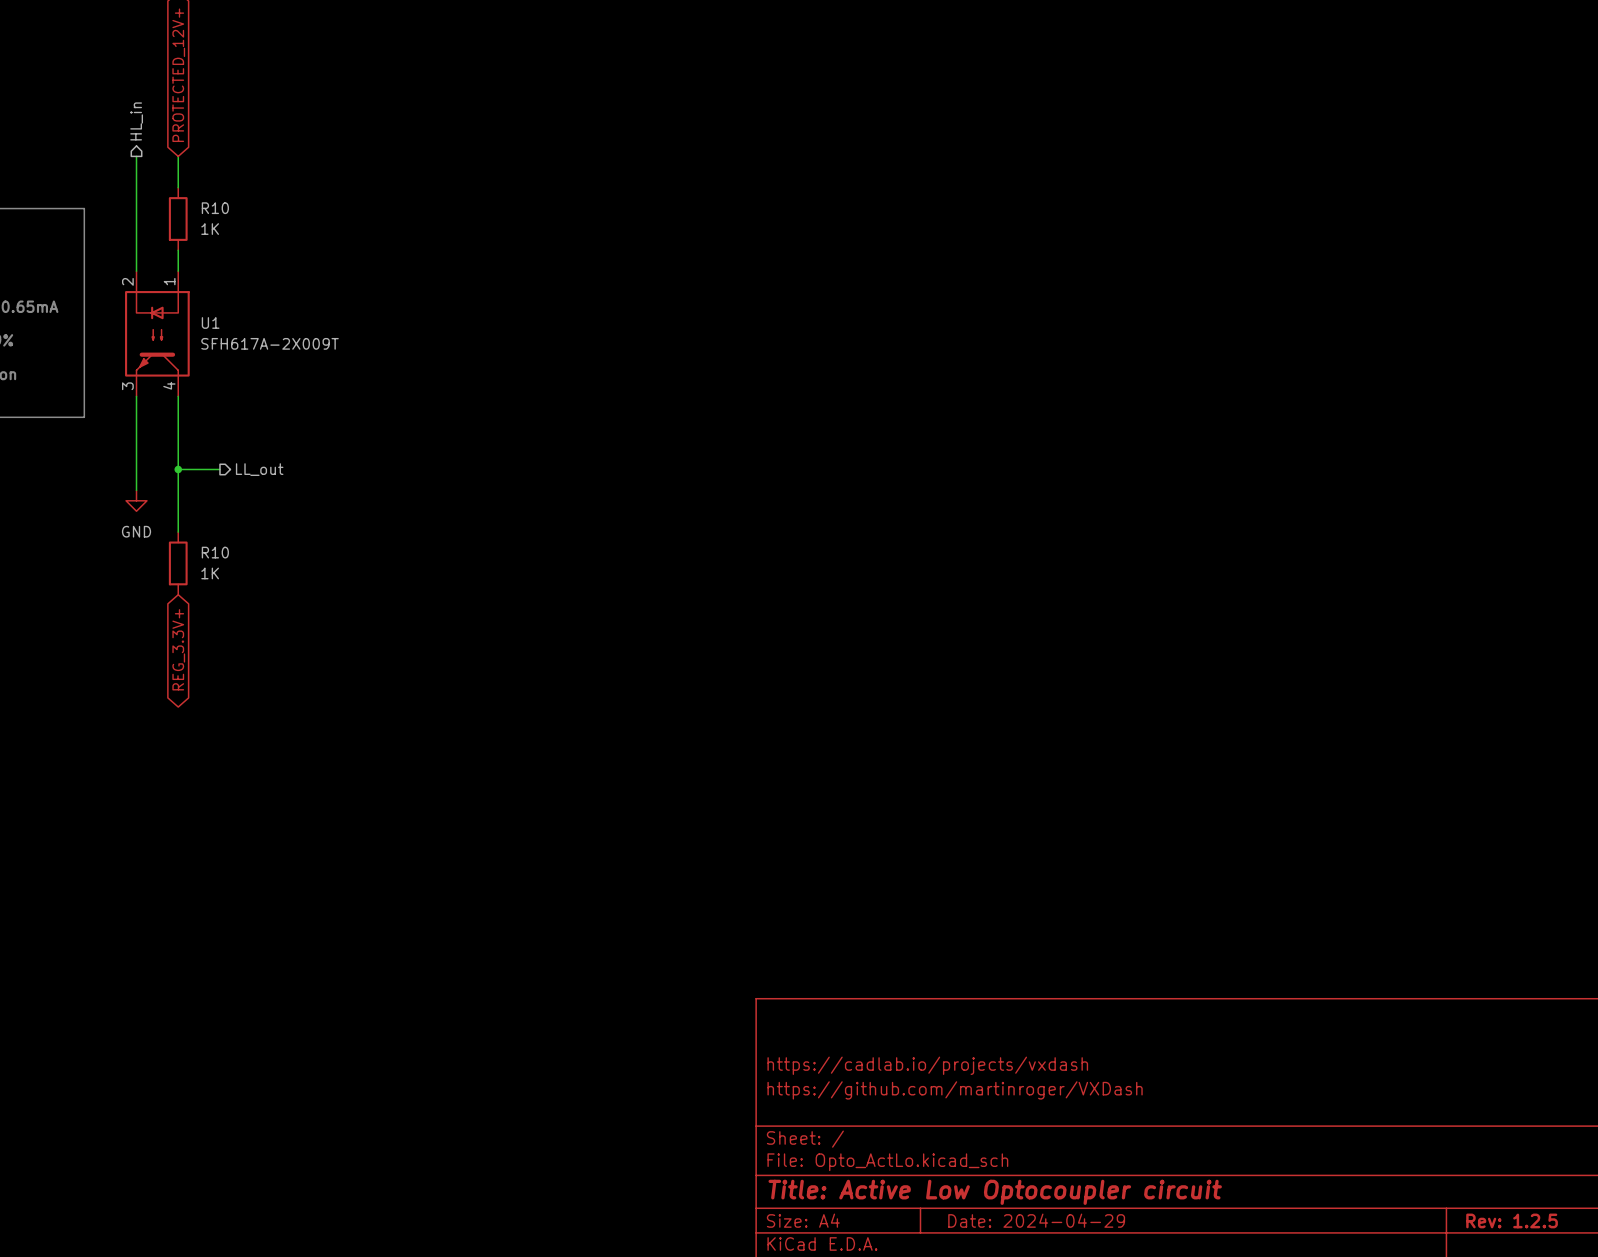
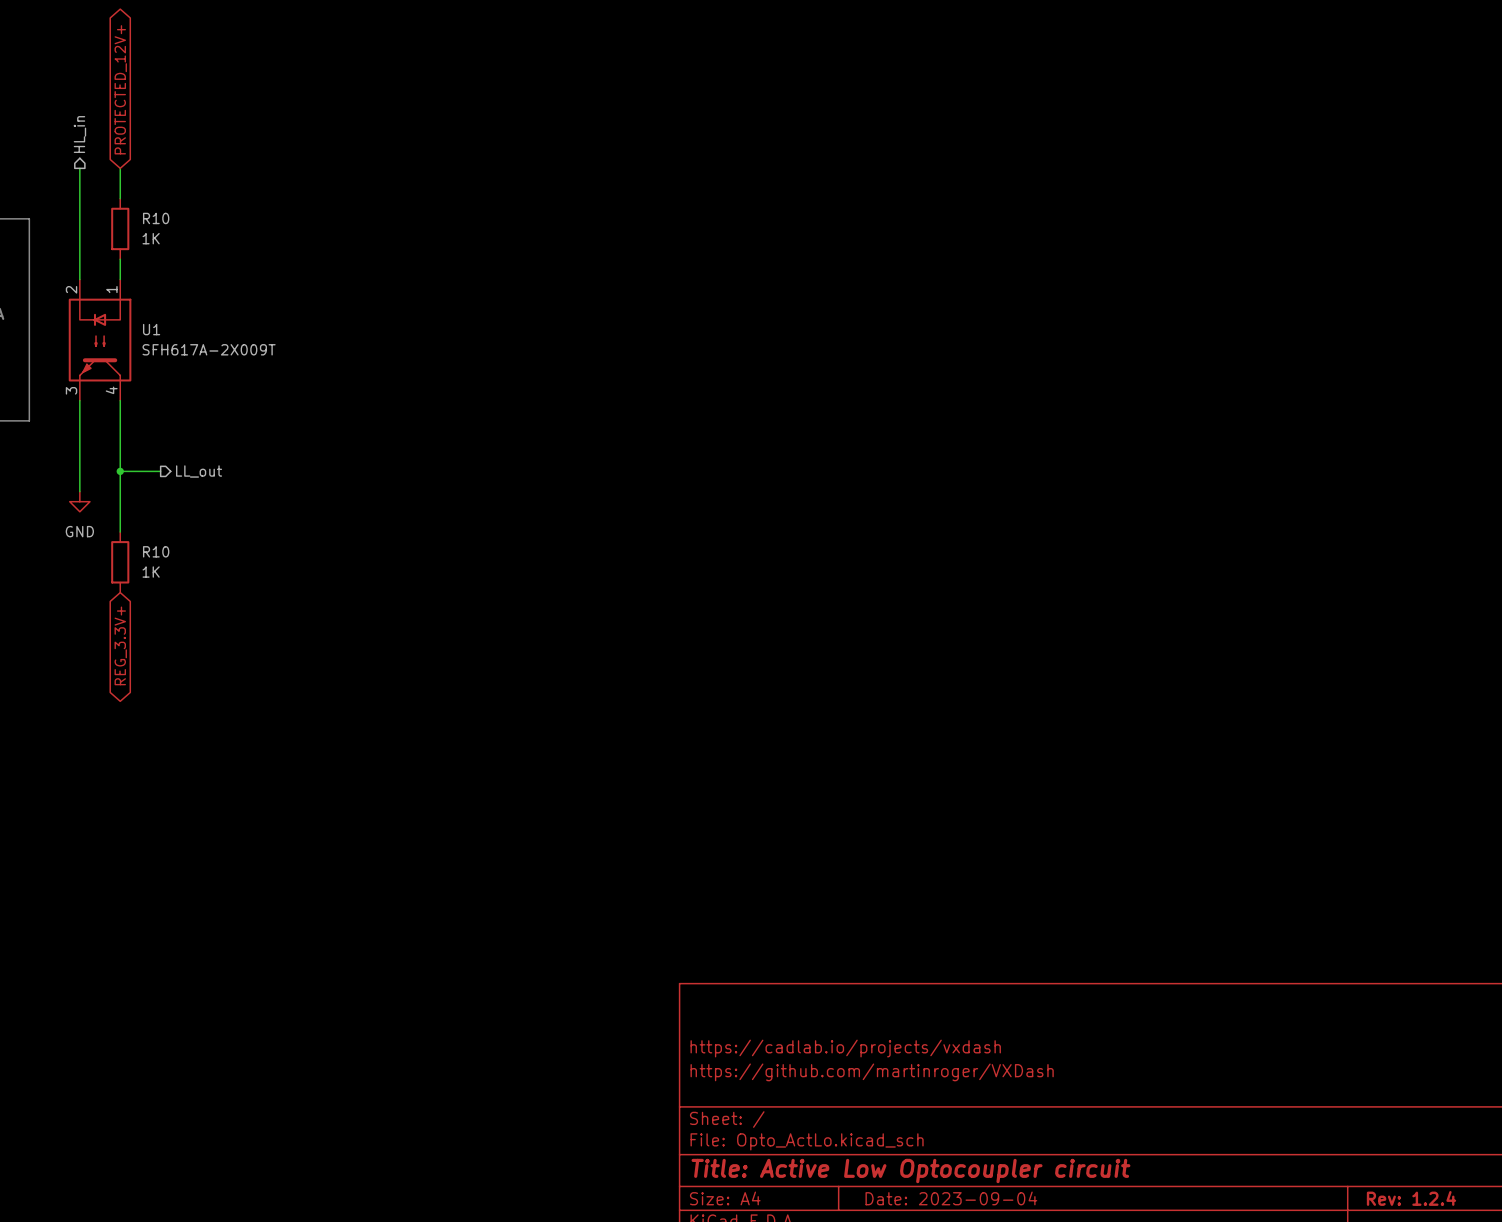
title block: Date: 2024-04-29 (1036, 1220) -> Date: 2023-09-04 (951, 1198)
title block: Rev: 1.2.5 (1512, 1220) -> Rev: 1.2.4 (1411, 1198)

